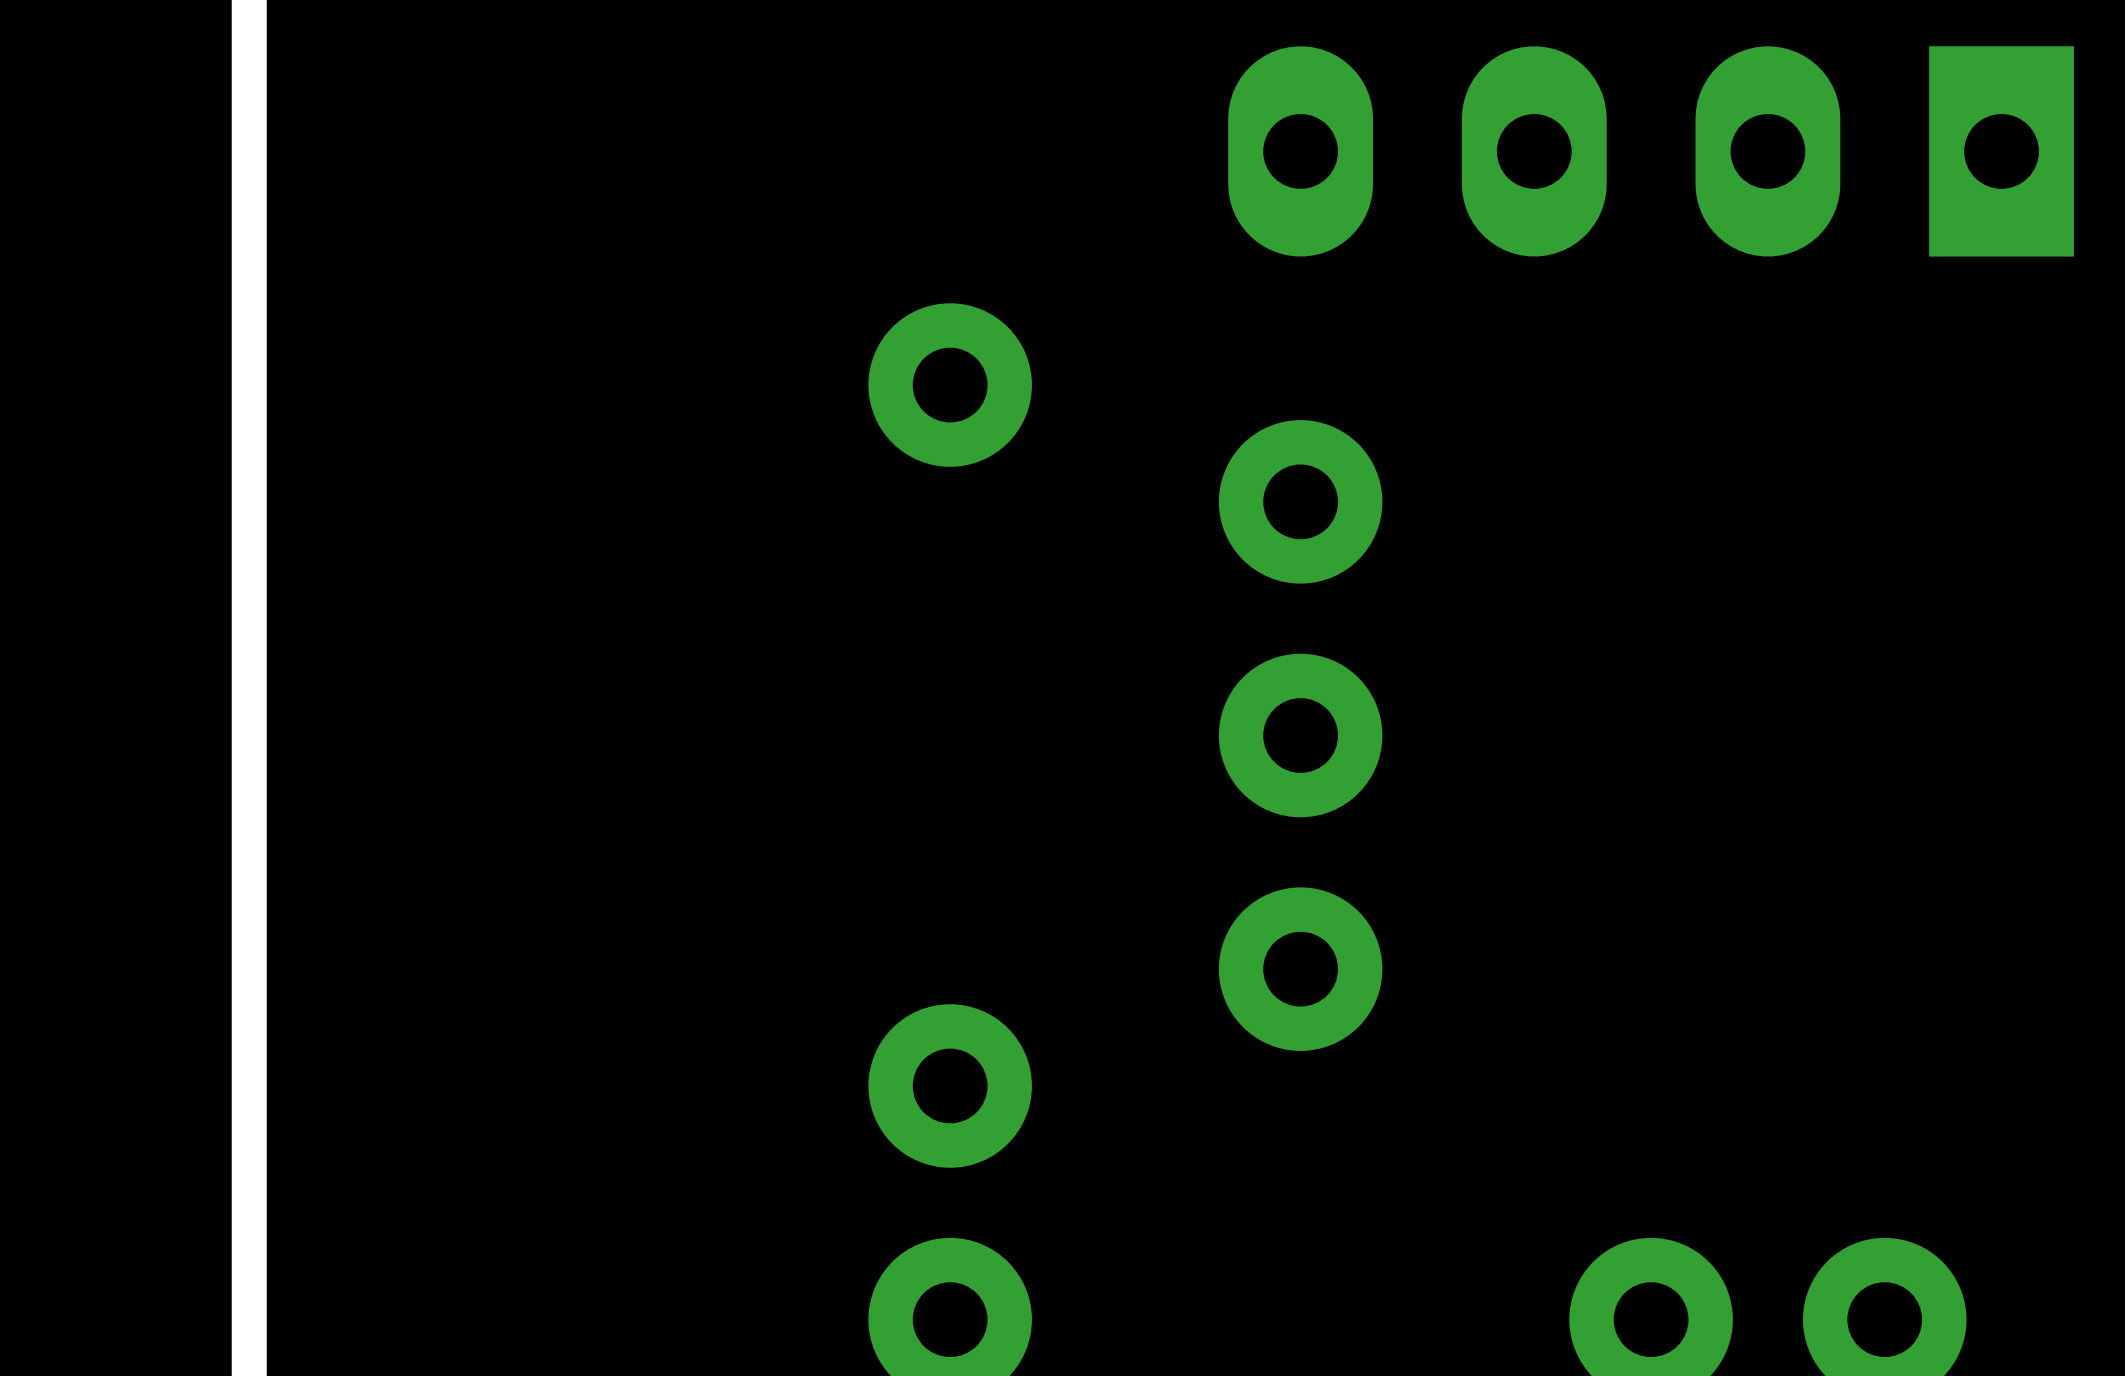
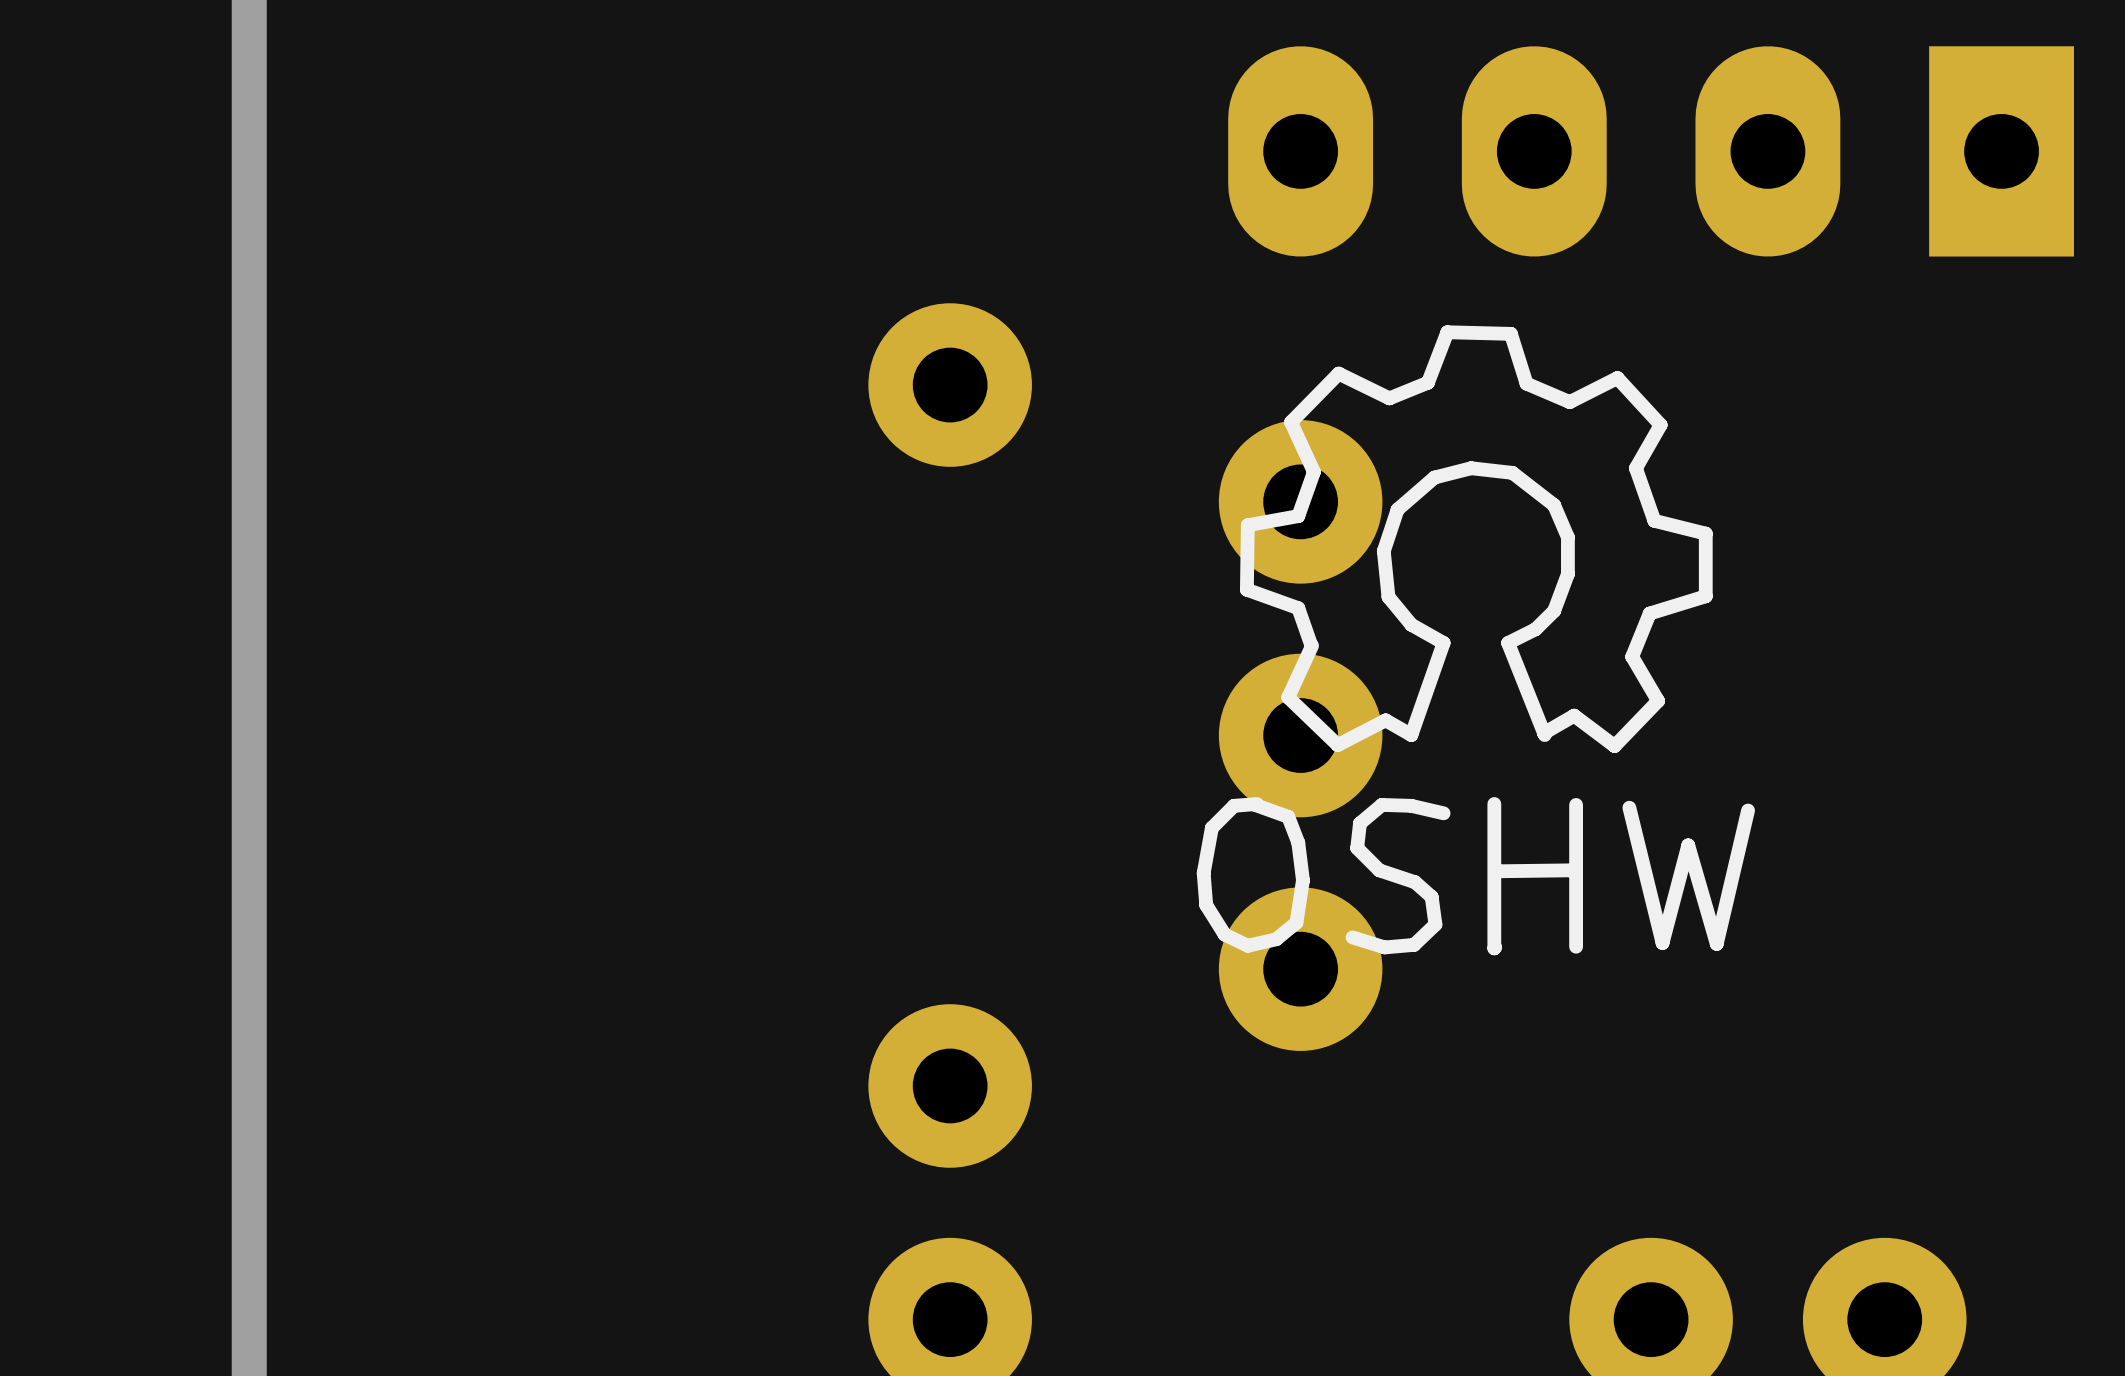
drawing: none -> [1196, 325, 1755, 956]

